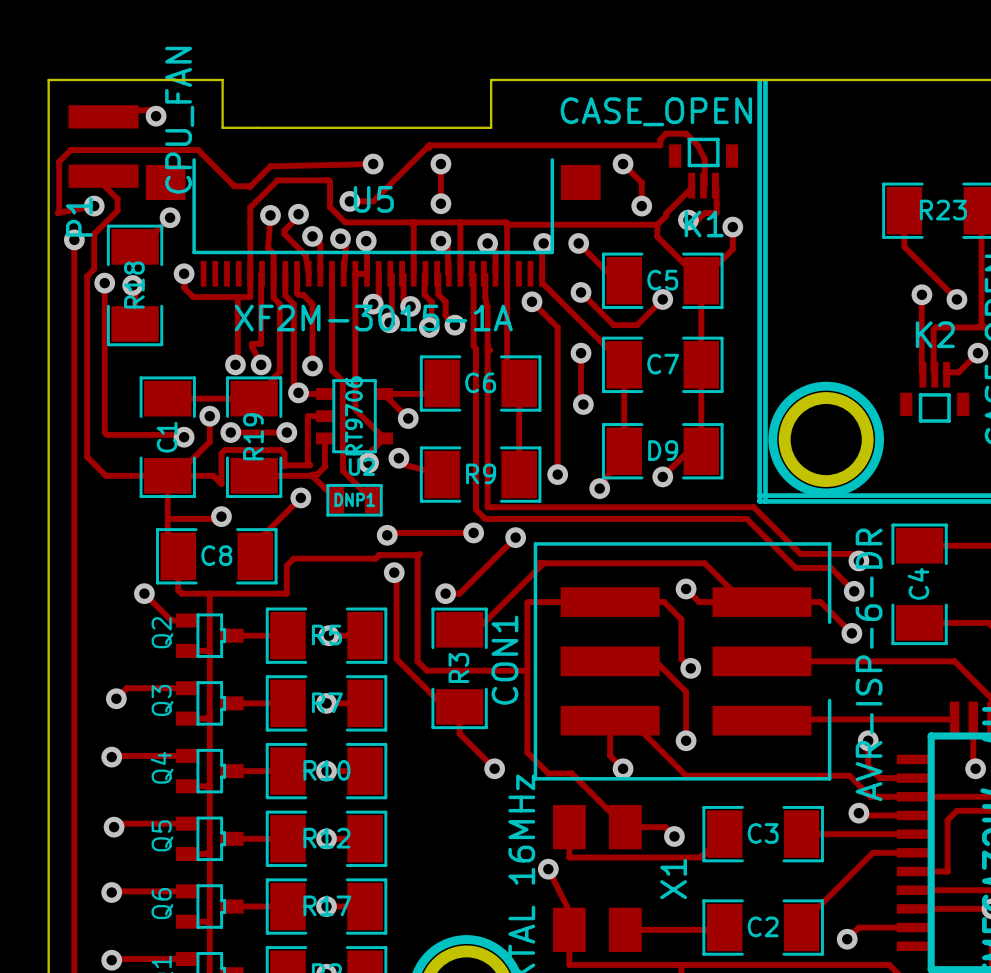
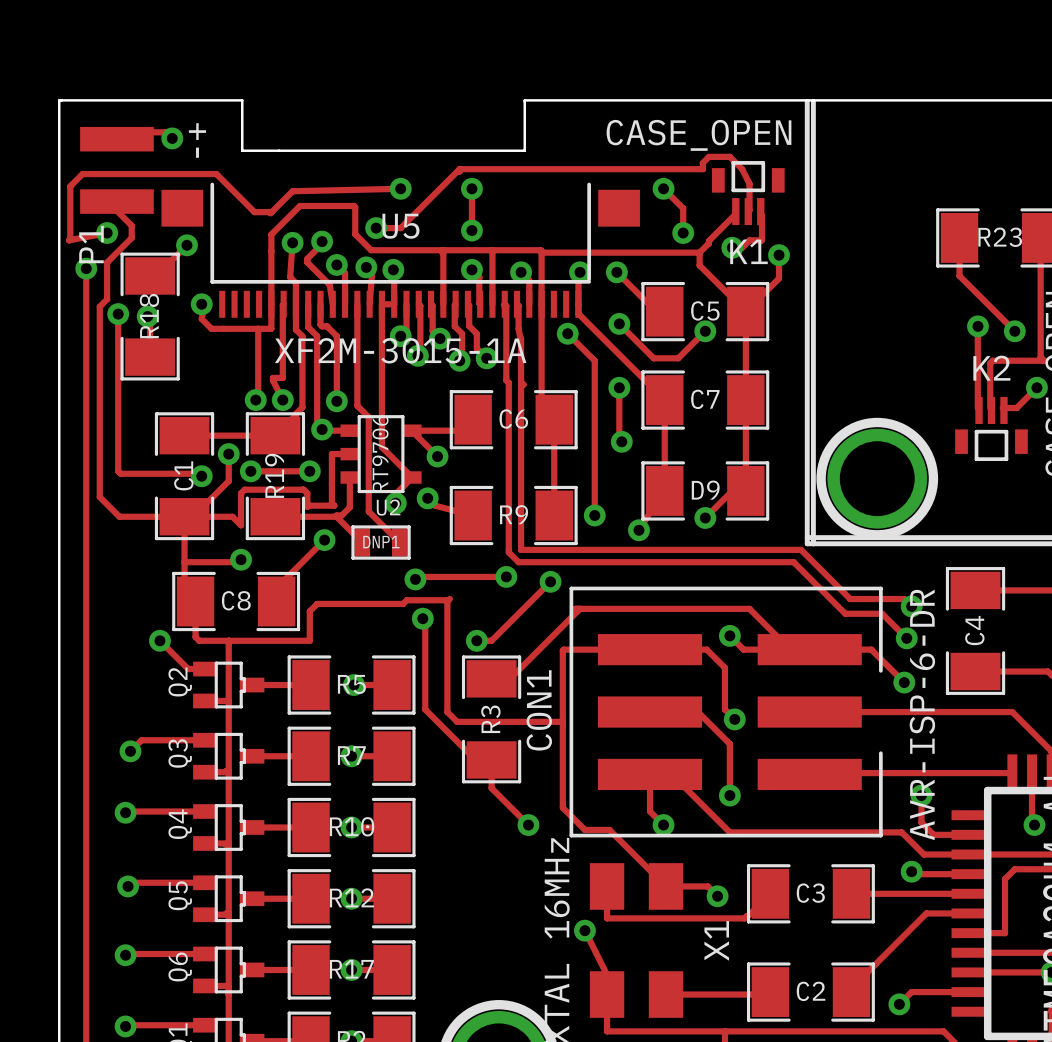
P1 value: CPU_FAN (179, 120) -> -+ (197, 140)

